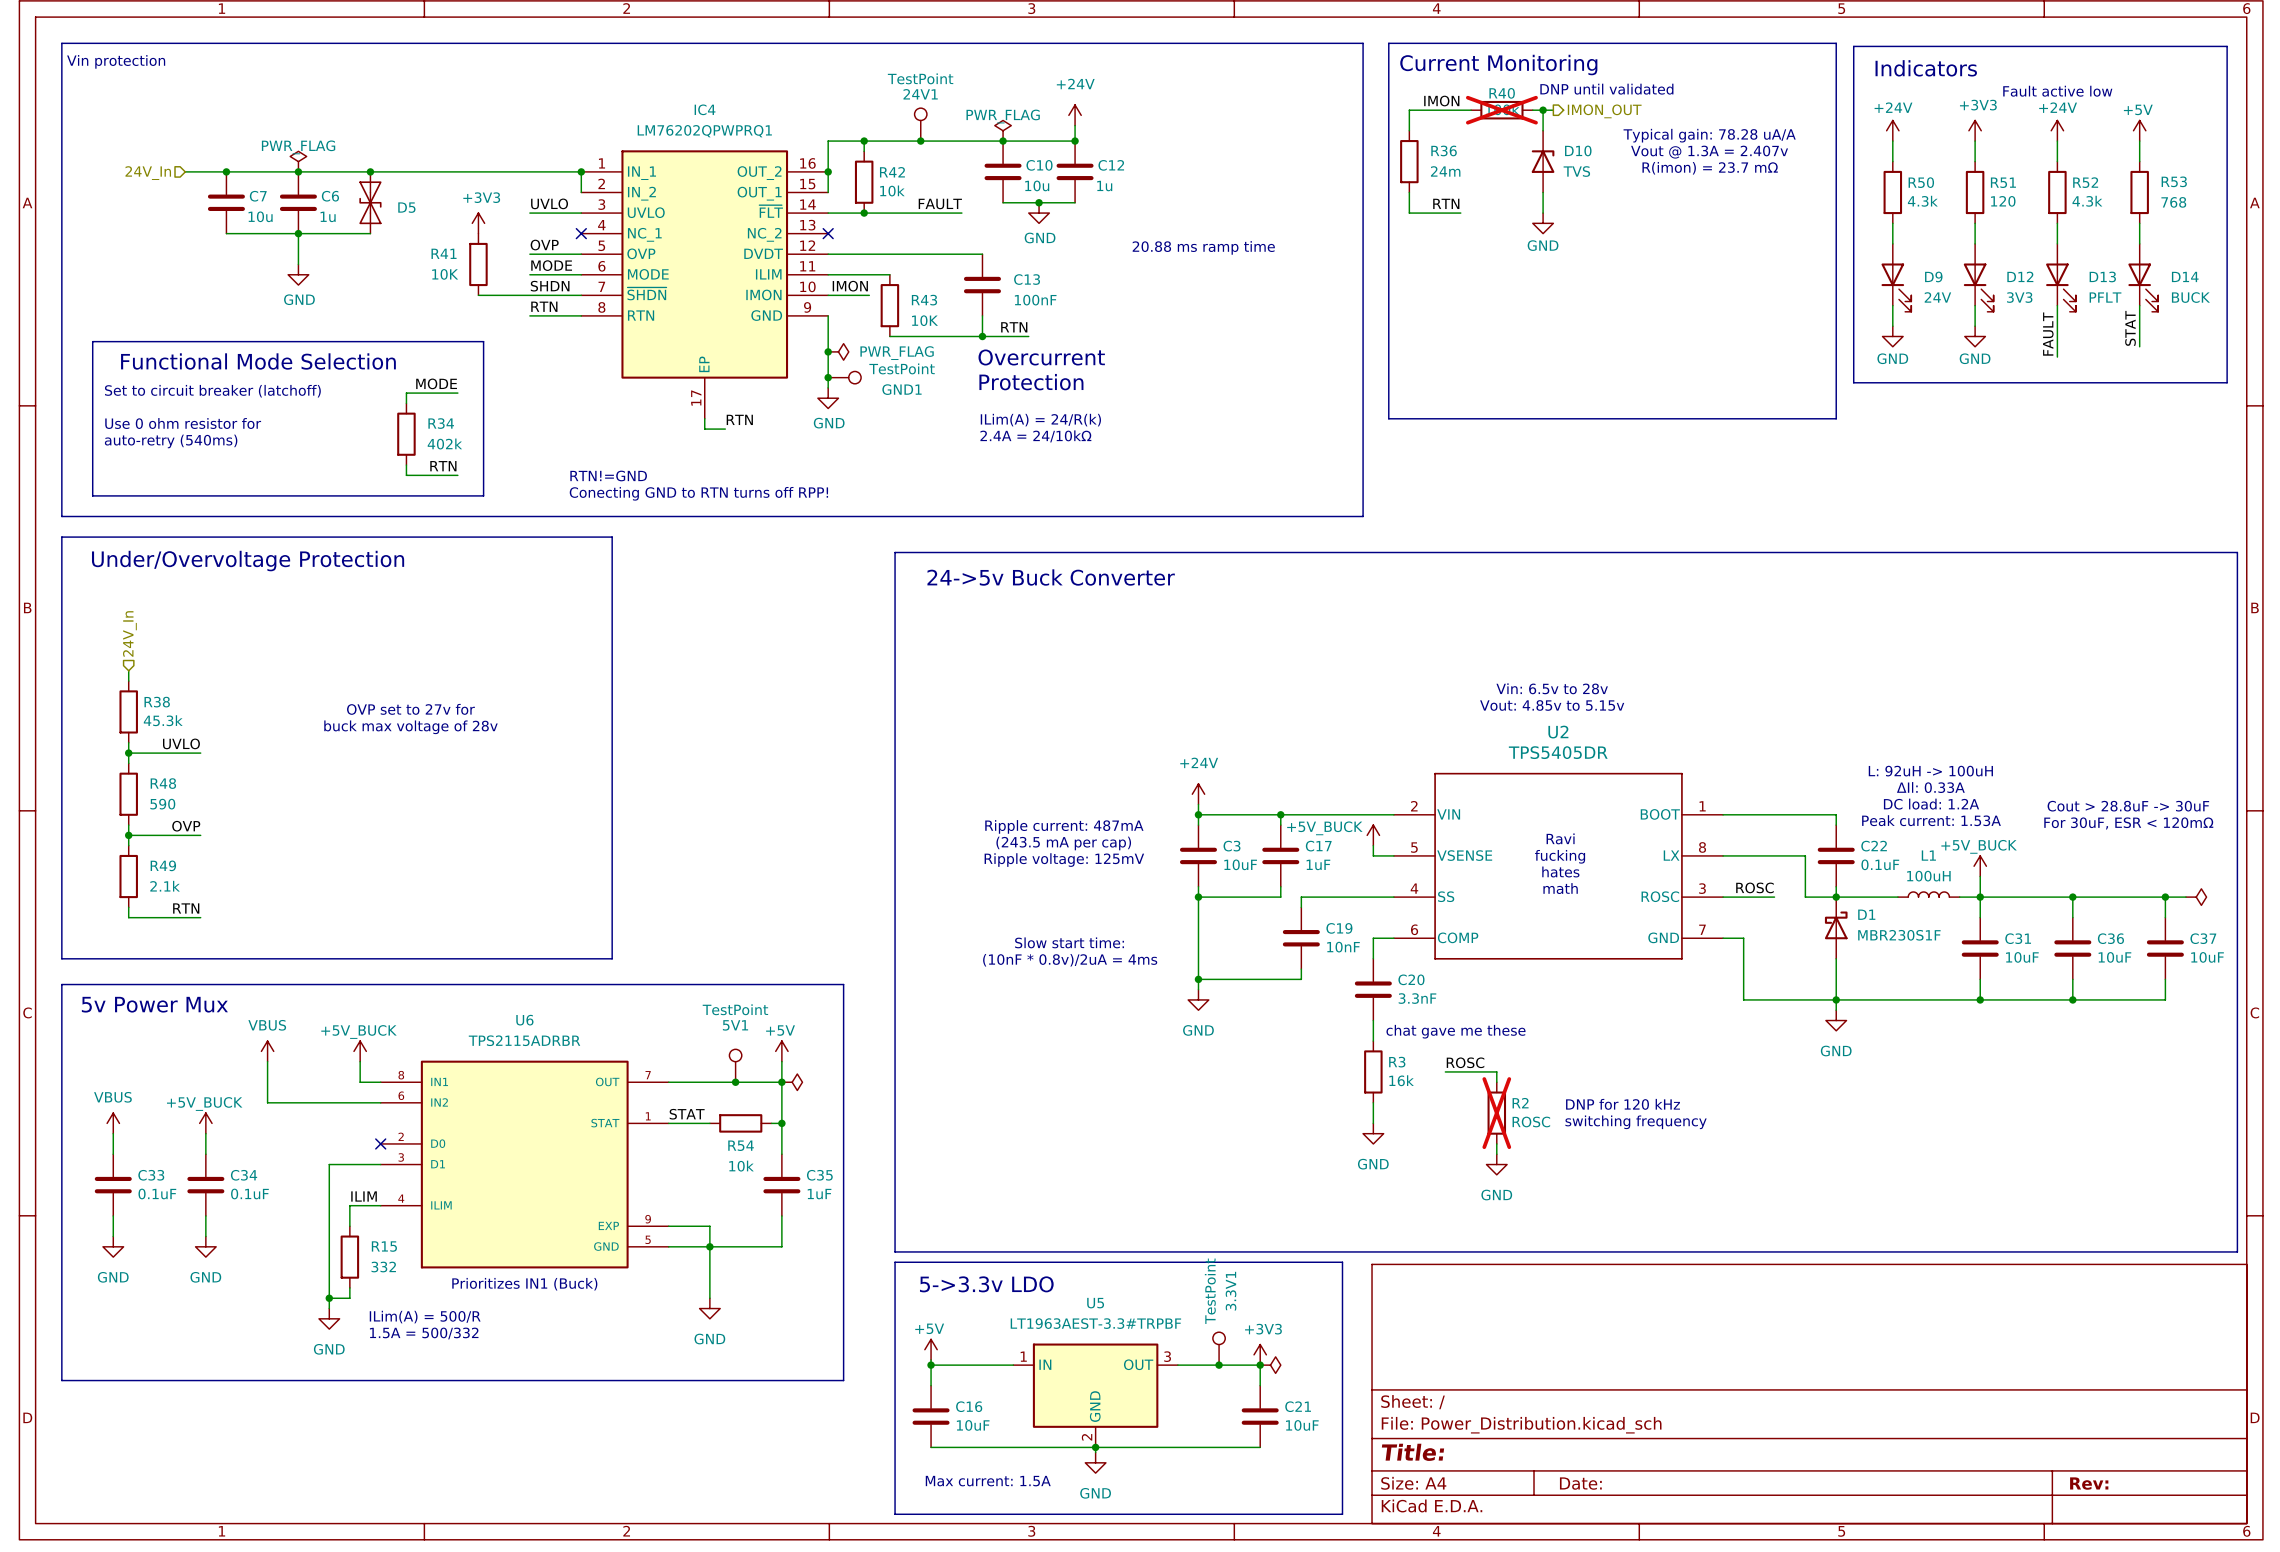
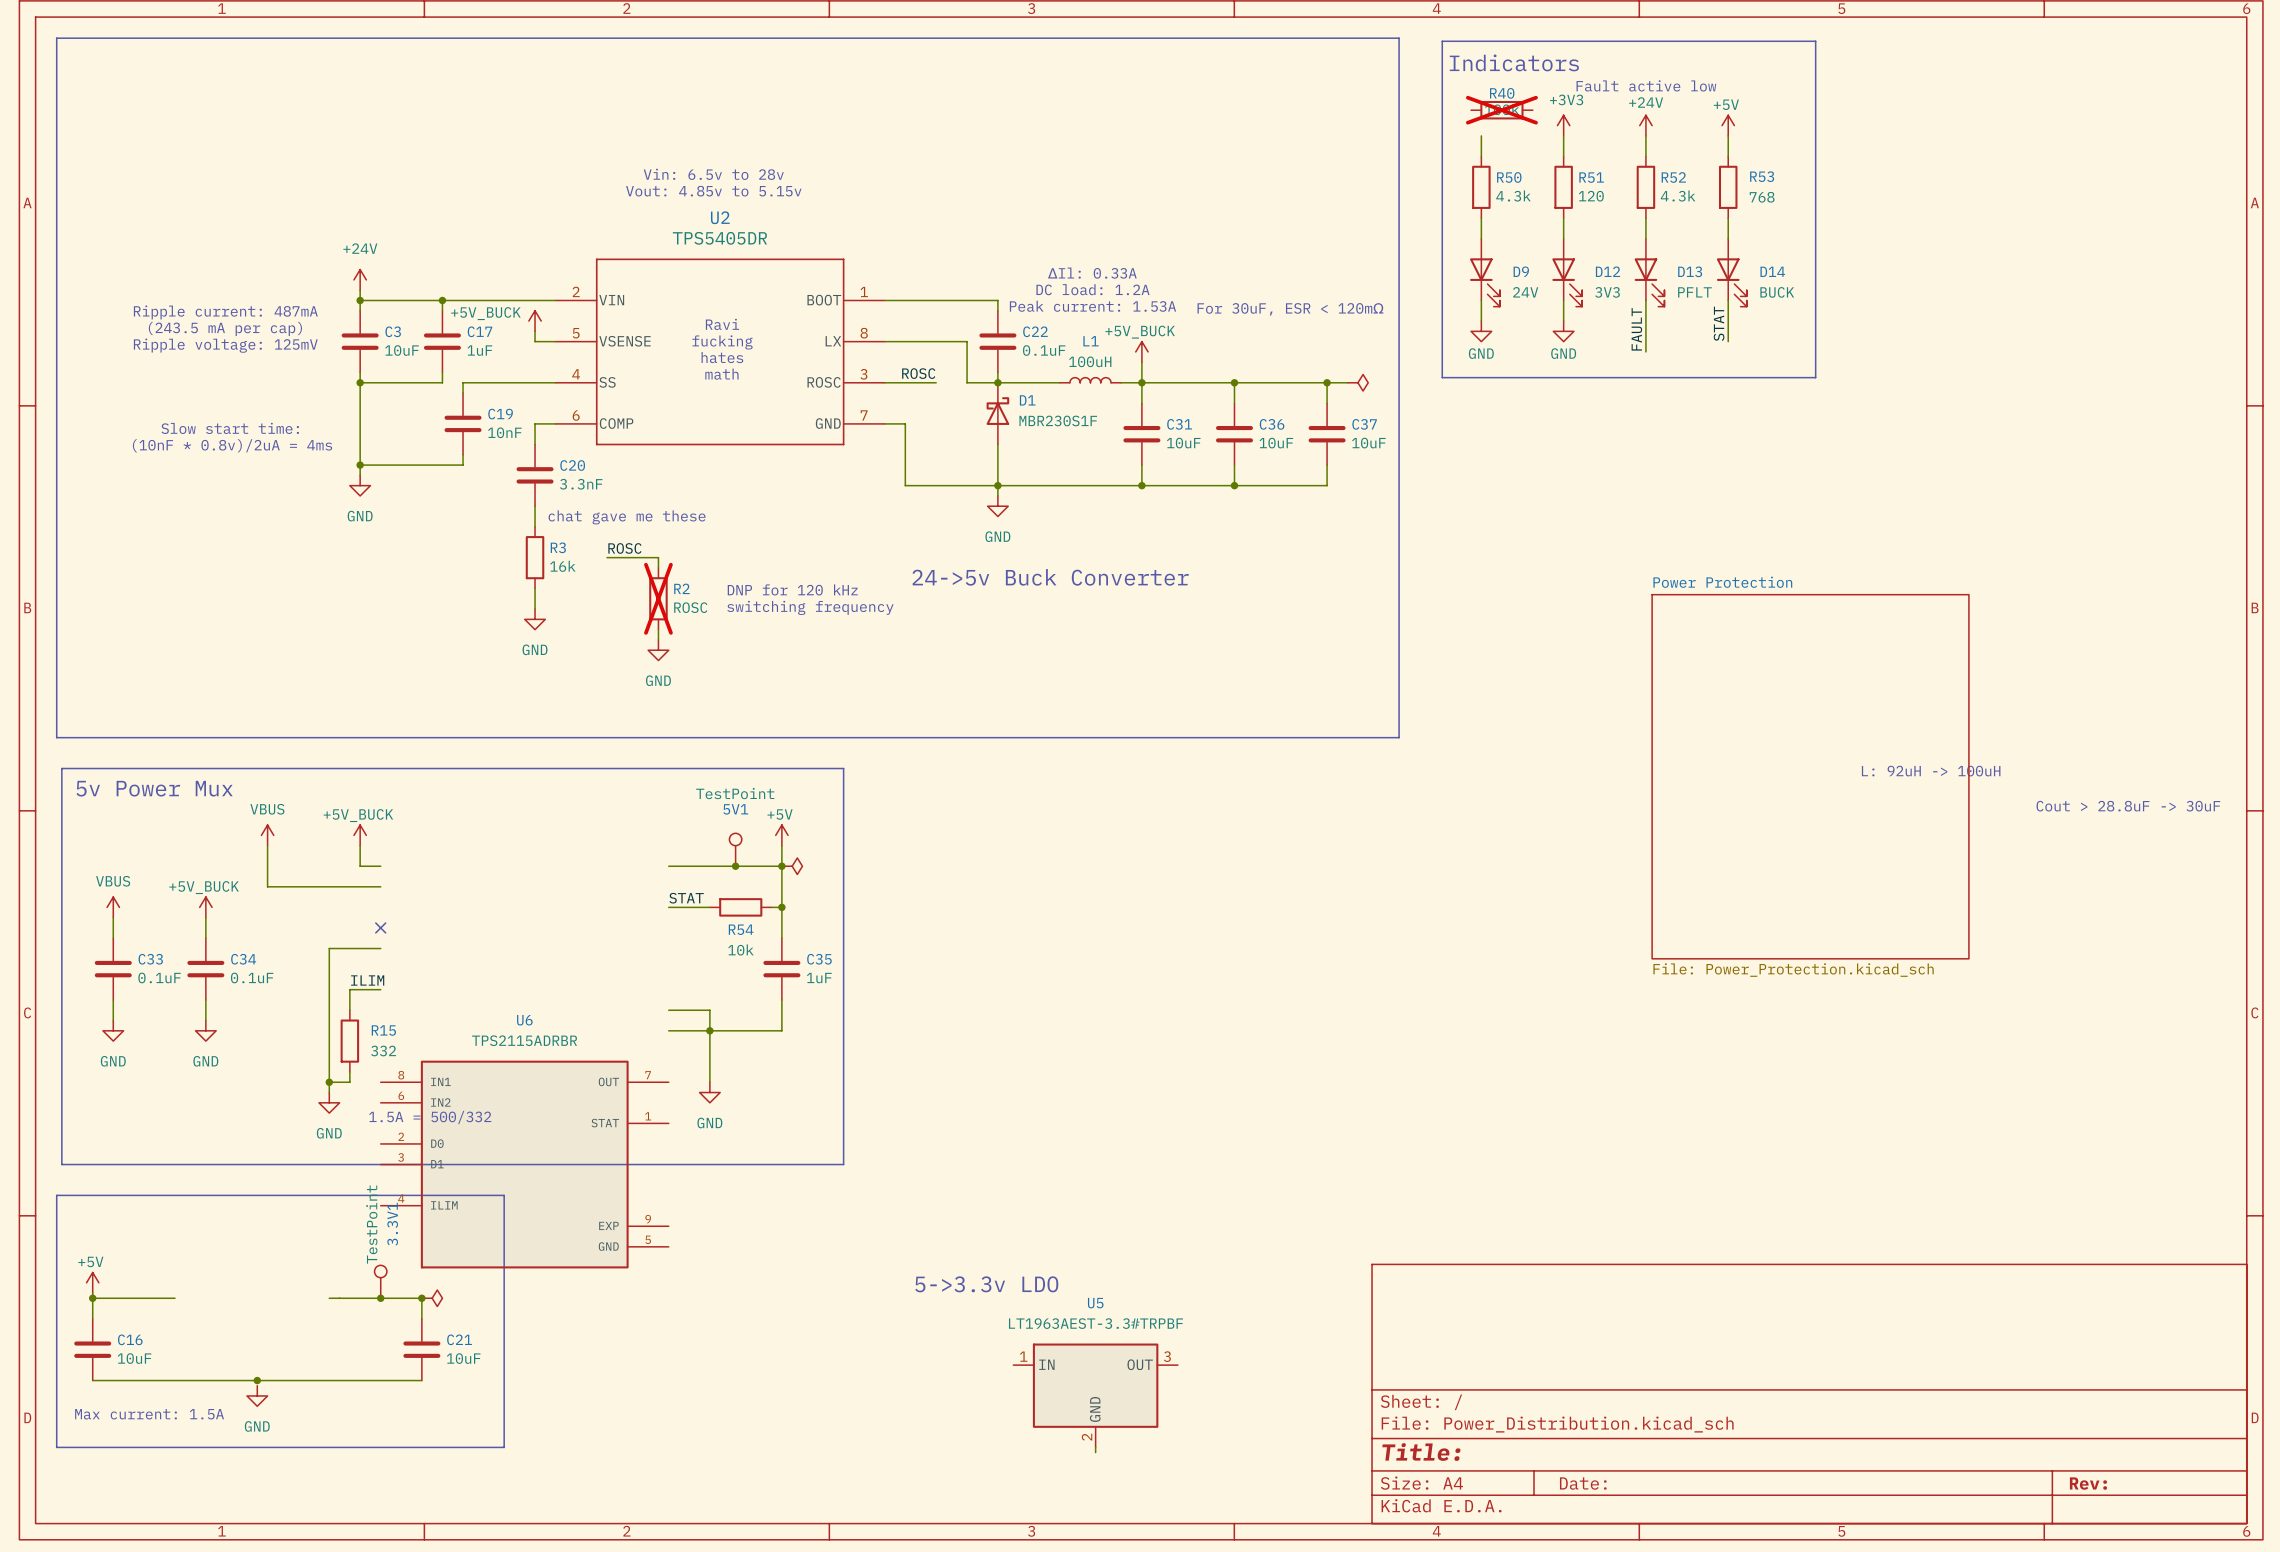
line: (61, 43) (61, 516) (1363, 516) (1363, 43) (61, 43) -> (56, 38) (56, 737) (1399, 737) (1399, 38) (56, 38)
line: (1388, 43) (1836, 43) (1836, 418) (1388, 418) (1388, 43) -> (1442, 41) (1442, 377) (1815, 377) (1815, 41) (1442, 41)
line: (1853, 46) (2227, 46) (2227, 382) (1853, 382) (1853, 46) -> none
text: Vin protection (116, 61) -> none
text: none -> Indicators (1514, 62)
text: Current Monitoring (1498, 65) -> none
text: Indicators (1926, 68) -> none
text: none -> Fault active low (1646, 85)
text: DNP until validated (1606, 89) -> none
text: Fault active low (2057, 91) -> none
label: IMON (1441, 101) -> none
wire: (1471, 110) (1409, 110) (1409, 130) -> none
wire: (1532, 110) (1553, 110) -> none
wire: (1543, 110) (1543, 130) -> (1563, 135) (1563, 156)
junction: (1543, 110) -> none
hierarchical label: IMON_OUT (1604, 111) -> none
power symbol: +24V (1075, 115) -> none
24V1: TestPoint (920, 124) -> none
wire: (1075, 125) (1075, 141) (828, 141) (828, 192) -> none
power symbol: none -> +3V3 (1563, 125)
power symbol: none -> +24V (1645, 125)
power symbol: none -> +5V (1728, 125)
power symbol: PWR_FLAG (1003, 130) -> none
power symbol: +24V (1892, 130) -> none
power symbol: +3V3 (1975, 130) -> none
power symbol: +24V (2057, 130) -> none
power symbol: +5V (2139, 130) -> none
wire: none -> (1481, 135) (1481, 156)
wire: none -> (1645, 135) (1645, 156)
text: Typical gain: 78.28 uA/A (1709, 135) -> none
wire: (864, 141) (864, 151) -> none
junction: (864, 141) -> none
junction: (920, 141) -> none
junction: (1003, 141) -> none
junction: (1075, 141) -> none
wire: (1892, 141) (1892, 161) -> (1728, 135) (1728, 156)
wire: (1975, 141) (1975, 161) -> none
wire: (2057, 141) (2057, 161) -> none
wire: (2139, 141) (2139, 161) -> none
text: Vout @ 1.3A = 2.407v (1709, 152) -> none
power symbol: PWR_FLAG (298, 161) -> none
R36: 24m (1409, 161) -> none
D10: TVS (1543, 161) -> none
text: R(imon) = 23.7 mΩ (1710, 168) -> none
wire: (185, 171) (581, 171) (581, 192) -> none
junction: (226, 171) -> none
junction: (298, 171) -> none
junction: (370, 171) -> none
junction: (581, 171) -> none
junction: (828, 171) -> none
C10: 10u (1003, 171) -> none
C12: 1u (1075, 171) -> none
hierarchical label: 24V_In (148, 173) -> none
text: none -> Vin: 6.5v to 28v (713, 174)
R42: 10k (864, 182) -> none
text: none -> Vout: 4.85v to 5.15v (713, 191)
wire: (1409, 192) (1409, 213) (1460, 213) -> none
wire: (1543, 192) (1543, 213) -> (1563, 218) (1563, 238)
R50 position: (1892, 192) -> (1481, 187)
R51 position: (1975, 192) -> (1563, 187)
R52 position: (2057, 192) -> (1645, 187)
R53 position: (2139, 192) -> (1728, 187)
C7: 10u (226, 202) -> none
C6: 1u (298, 202) -> none
D5: (370, 202) -> none
wire: (1003, 202) (1075, 202) -> none
junction: (1039, 202) -> none
label: UVLO (549, 203) -> none
label: FAULT (940, 203) -> none
label: RTN (1446, 203) -> none
wire: (529, 213) (581, 213) -> none
wire: (828, 213) (961, 213) -> none
junction: (864, 213) -> none
power symbol: GND (1039, 213) -> none
wire: none -> (1481, 218) (1481, 238)
wire: none -> (1645, 218) (1645, 238)
power symbol: +3V3 (478, 223) -> none
power symbol: GND (1543, 223) -> none
wire: (1892, 223) (1892, 243) -> (1728, 218) (1728, 238)
wire: (1975, 223) (1975, 243) -> none
wire: (2057, 223) (2057, 243) -> none
wire: (2139, 223) (2139, 243) -> none
wire: (226, 233) (370, 233) -> none
wire: (298, 233) (298, 264) -> none
junction: (298, 233) -> none
no-connect mark: (581, 233) -> none
no-connect mark: (828, 233) -> none
label: OVP (544, 245) -> none
text: 20.88 ms ramp time (1203, 247) -> none
wire: (529, 254) (581, 254) -> none
wire: (828, 254) (982, 254) -> none
R41: 10K (478, 264) -> none
label: MODE (551, 265) -> none
text: none -> ΔIl: 0.33A (1092, 273)
power symbol: GND (298, 274) -> none
wire: (529, 274) (581, 274) -> none
wire: (828, 274) (889, 274) -> none
D9 position: (1896, 277) -> (1484, 272)
D12 position: (1978, 277) -> (1567, 272)
D13 position: (2060, 277) -> (1649, 272)
D14 position: (2143, 277) -> (1731, 272)
power symbol: none -> +24V (360, 279)
IC4: LM76202QPWPRQ1 (704, 284) -> none
C13: 100nF (982, 285) -> none
label: SHDN (550, 286) -> none
label: IMON (850, 286) -> none
text: none -> DC load: 1.2A (1093, 289)
wire: none -> (360, 290) (360, 310)
wire: (478, 295) (581, 295) -> none
wire: (828, 295) (869, 295) -> none
wire: none -> (360, 300) (555, 300)
junction: none -> (360, 300)
wire: none -> (442, 300) (442, 310)
junction: none -> (442, 300)
wire: none -> (884, 300) (997, 300) (997, 310)
wire: none -> (1481, 300) (1481, 321)
wire: none -> (1563, 300) (1563, 321)
wire: none -> (1645, 300) (1645, 351)
wire: none -> (1728, 300) (1728, 341)
R43: 10K (889, 305) -> none
wire: (1892, 305) (1892, 326) -> none
wire: (1975, 305) (1975, 326) -> none
wire: (2057, 305) (2057, 357) -> none
wire: (2139, 305) (2139, 346) -> none
label: RTN (544, 306) -> none
text: none -> Peak current: 1.53A (1092, 306)
text: none -> For 30uF, ESR < 120mΩ (1290, 309)
text: none -> Ripple current: 487mA (225, 312)
wire: (529, 315) (581, 315) -> none
wire: (828, 315) (828, 387) -> none
wire: (982, 315) (982, 336) -> none
power symbol: none -> +5V_BUCK (535, 321)
label: none -> STAT (1719, 323)
text: none -> Ravi (722, 324)
label: RTN (1014, 327) -> none
label: none -> FAULT (1636, 329)
label: STAT (2130, 328) -> none
text: none -> (243.5 mA per cap) (225, 328)
power symbol: none -> GND (1481, 331)
power symbol: none -> GND (1563, 331)
label: FAULT (2048, 334) -> none
wire: (889, 336) (1028, 336) -> none
junction: (982, 336) -> none
power symbol: GND (1892, 336) -> none
power symbol: GND (1975, 336) -> none
line: (92, 341) (483, 341) (483, 495) (92, 495) (92, 341) -> none
wire: none -> (884, 341) (967, 341) (967, 382) (1059, 382)
text: none -> fucking (722, 342)
text: none -> Ripple voltage: 125mV (225, 345)
junction: (828, 351) -> none
power symbol: PWR_FLAG (838, 351) -> none
power symbol: none -> +5V_BUCK (1141, 351)
text: none -> hates (722, 357)
text: Overcurrent (1041, 357) -> none
text: Functional Mode Selection (258, 361) -> none
wire: none -> (1141, 362) (1141, 403)
wire: none -> (360, 372) (360, 475)
wire: none -> (442, 372) (442, 382) (360, 382)
wire: none -> (997, 372) (997, 382)
label: none -> ROSC (918, 373)
text: none -> math (721, 374)
junction: (828, 377) -> none
GND1: TestPoint (844, 377) -> none
junction: none -> (360, 382)
wire: none -> (555, 382) (463, 382) (463, 393)
wire: none -> (884, 382) (936, 382)
junction: none -> (997, 382)
text: Protection (1031, 382) -> none
wire: none -> (1121, 382) (1347, 382)
junction: none -> (1141, 382)
wire: none -> (1234, 382) (1234, 403)
junction: none -> (1234, 382)
wire: none -> (1327, 382) (1327, 403)
junction: none -> (1327, 382)
power symbol: none -> (1357, 382)
label: MODE (436, 383) -> none
text: Set to circuit breaker (latchoff) (212, 391) -> none
wire: (457, 393) (406, 393) (406, 403) -> none
power symbol: GND (828, 398) -> none
wire: (704, 418) (704, 429) (725, 429) -> (535, 331) (535, 341) (555, 341)
label: RTN (739, 419) -> none
text: ILim(A) = 24/R(k) (1040, 420) -> none
text: Use 0 ohm resistor for (183, 423) -> none
wire: none -> (555, 423) (535, 423) (535, 444)
wire: none -> (884, 423) (905, 423) (905, 485) (1327, 485) (1327, 465)
text: none -> Slow start time: (230, 428)
R34: 402k (406, 434) -> none
text: 2.4A = 24/10kΩ (1035, 436) -> none
text: auto-retry (540ms) (171, 441) -> none
wire: none -> (997, 444) (997, 495)
text: none -> (10nF * 0.8v)/2uA = 4ms (232, 445)
wire: none -> (463, 454) (463, 465) (360, 465)
junction: none -> (360, 465)
wire: (406, 465) (406, 475) (457, 475) -> none
wire: none -> (1141, 465) (1141, 485)
wire: none -> (1234, 465) (1234, 485)
label: RTN (443, 466) -> none
text: RTN!=GND (608, 475) -> none
power symbol: none -> GND (360, 485)
junction: none -> (997, 485)
junction: none -> (1141, 485)
junction: none -> (1234, 485)
text: Conecting GND to RTN turns off RPP! (698, 493) -> none
wire: none -> (535, 506) (535, 526)
power symbol: none -> GND (997, 506)
text: none -> chat gave me these (627, 517)
label: none -> ROSC (624, 548)
line: (895, 552) (895, 1251) (2237, 1251) (2237, 552) (895, 552) -> none
wire: none -> (607, 557) (658, 557) (658, 567)
text: Under/Overvoltage Protection (248, 561) -> none
wire: none -> (535, 588) (535, 609)
text: none -> DNP for 120 kHz (792, 589)
text: none -> switching frequency (810, 607)
power symbol: none -> GND (535, 619)
wire: none -> (658, 629) (658, 639)
hierarchical label: 24V_In (129, 633) -> none
power symbol: none -> GND (658, 650)
wire: (128, 670) (128, 681) -> none
text: Vin: 6.5v to 28v (1552, 688) -> none
text: Vout: 4.85v to 5.15v (1552, 705) -> none
text: OVP set to 27v for (410, 709) -> none
R38: 45.3k (128, 711) -> none
text: buck max voltage of 28v (410, 727) -> none
wire: (128, 742) (128, 763) -> (113, 917) (113, 938)
label: UVLO (181, 743) -> none
wire: (128, 753) (200, 753) -> none
junction: (128, 753) -> none
line: (61, 768) (61, 537) (612, 537) (612, 958) (61, 958) -> (61, 984) (61, 958)
sheet Power Protection: none -> File: Power_Protection.kicad_sch (1810, 776)
text: ΔIl: 0.33A (1930, 787) -> none
text: none -> 5v Power Mux (154, 788)
R48: 590 (128, 794) -> none
power symbol: +24V (1198, 794) -> none
wire: (1198, 804) (1198, 825) -> none
text: DC load: 1.2A (1931, 804) -> none
wire: (1198, 814) (1393, 814) -> none
junction: (1198, 814) -> none
wire: (1280, 814) (1280, 825) -> none
junction: (1280, 814) -> none
wire: (1723, 814) (1836, 814) (1836, 825) -> none
text: Peak current: 1.53A (1931, 820) -> none
text: For 30uF, ESR < 120mΩ (2128, 823) -> none
wire: (128, 825) (128, 845) -> (205, 917) (205, 938)
label: OVP (186, 826) -> none
text: Ripple current: 487mA (1064, 826) -> none
wire: (128, 835) (200, 835) -> none
junction: (128, 835) -> none
power symbol: none -> VBUS (267, 835)
power symbol: none -> +5V_BUCK (360, 835)
power symbol: none -> +5V (781, 835)
power symbol: +5V_BUCK (1373, 835) -> none
text: Ravi (1560, 838) -> none
text: (243.5 mA per cap) (1063, 843) -> none
wire: none -> (267, 845) (267, 886) (380, 886)
wire: none -> (360, 845) (360, 866) (380, 866)
wire: none -> (781, 845) (781, 938)
wire: (1373, 845) (1373, 855) (1393, 855) -> none
C3 position: (1198, 855) -> (360, 341)
C17 position: (1280, 855) -> (442, 341)
wire: (1723, 855) (1805, 855) (1805, 897) (1897, 897) -> none
C22 position: (1836, 855) -> (997, 341)
text: fucking (1560, 856) -> none
text: Ripple voltage: 125mV (1064, 860) -> none
wire: none -> (668, 866) (781, 866)
junction: none -> (735, 866)
junction: none -> (781, 866)
power symbol: none -> (792, 866)
U2 position: (1558, 866) -> (720, 351)
power symbol: +5V_BUCK (1980, 866) -> none
text: hates (1560, 871) -> none
R49: 2.1k (128, 876) -> none
wire: (1980, 876) (1980, 917) -> none
wire: (1198, 886) (1198, 989) -> none
wire: (1280, 886) (1280, 897) (1198, 897) -> none
wire: (1836, 886) (1836, 897) -> none
label: ROSC (1754, 887) -> none
text: math (1560, 888) -> none
L1 position: (1928, 894) -> (1090, 380)
junction: (1198, 897) -> none
wire: (1393, 897) (1301, 897) (1301, 907) -> none
wire: (1723, 897) (1774, 897) -> none
junction: (1836, 897) -> none
wire: (1959, 897) (2185, 897) -> none
junction: (1980, 897) -> none
wire: (2072, 897) (2072, 917) -> none
junction: (2072, 897) -> none
wire: (2165, 897) (2165, 917) -> none
junction: (2165, 897) -> none
power symbol: (2196, 897) -> none
label: none -> STAT (686, 898)
power symbol: none -> VBUS (113, 907)
wire: (128, 907) (128, 917) (200, 917) -> none
power symbol: none -> +5V_BUCK (205, 907)
wire: none -> (668, 907) (709, 907)
wire: none -> (771, 907) (781, 907)
junction: none -> (781, 907)
label: RTN (186, 908) -> none
no-connect mark: none -> (380, 927)
D1 position: (1836, 927) -> (997, 413)
C19 position: (1301, 938) -> (463, 423)
wire: (1393, 938) (1373, 938) (1373, 958) -> none
wire: (1723, 938) (1743, 938) (1743, 999) (2165, 999) (2165, 979) -> none
text: Slow start time: (1069, 942) -> none
wire: none -> (380, 948) (329, 948) (329, 1092)
C31 position: (1980, 948) -> (1141, 434)
C36 position: (2072, 948) -> (1234, 434)
C37 position: (2165, 948) -> (1327, 434)
wire: (1836, 958) (1836, 1010) -> none
text: (10nF * 0.8v)/2uA = 4ms (1070, 960) -> none
wire: (1301, 969) (1301, 979) (1198, 979) -> none
junction: (1198, 979) -> none
wire: (1980, 979) (1980, 999) -> none
wire: (2072, 979) (2072, 999) -> none
label: none -> ILIM (367, 980)
line: (61, 984) (843, 984) -> (61, 768) (843, 768) (843, 984)
wire: none -> (380, 989) (349, 989) (349, 1010)
C20 position: (1373, 989) -> (535, 475)
wire: none -> (781, 999) (781, 1030) (668, 1030)
power symbol: GND (1198, 999) -> none
junction: (1836, 999) -> none
junction: (1980, 999) -> none
junction: (2072, 999) -> none
text: 5v Power Mux (154, 1004) -> none
wire: none -> (668, 1010) (709, 1010) (709, 1082)
wire: (1373, 1020) (1373, 1041) -> none
power symbol: GND (1836, 1020) -> none
power symbol: none -> GND (113, 1030)
power symbol: none -> GND (205, 1030)
junction: none -> (709, 1030)
text: chat gave me these (1455, 1031) -> none
power symbol: VBUS (267, 1051) -> none
power symbol: +5V_BUCK (360, 1051) -> none
power symbol: +5V (781, 1051) -> none
wire: (267, 1061) (267, 1102) (380, 1102) -> none
wire: (360, 1061) (360, 1082) (380, 1082) -> none
wire: (781, 1061) (781, 1154) -> none
label: ROSC (1465, 1062) -> none
5V1 position: (735, 1065) -> (735, 849)
wire: none -> (349, 1071) (349, 1082) (329, 1082)
R3 position: (1373, 1071) -> (535, 557)
wire: (1445, 1071) (1496, 1071) (1496, 1082) -> none
junction: none -> (329, 1082)
wire: (668, 1082) (781, 1082) -> none
junction: (735, 1082) -> none
junction: (781, 1082) -> none
power symbol: (792, 1082) -> none
power symbol: none -> GND (709, 1092)
power symbol: none -> GND (329, 1102)
wire: (1373, 1102) (1373, 1123) -> none
text: DNP for 120 kHz (1623, 1104) -> none
R2 position: (1496, 1113) -> (658, 598)
label: STAT (687, 1114) -> none
text: none -> 1.5A = 500/332 (430, 1117)
text: switching frequency (1636, 1122) -> none
power symbol: VBUS (113, 1123) -> none
power symbol: +5V_BUCK (205, 1123) -> none
wire: (668, 1123) (709, 1123) -> none
R54 position: (740, 1123) -> (740, 907)
wire: (771, 1123) (781, 1123) -> none
junction: (781, 1123) -> none
wire: (113, 1133) (113, 1154) -> (113, 999) (113, 1020)
wire: (205, 1133) (205, 1154) -> (205, 999) (205, 1020)
power symbol: GND (1373, 1133) -> none
no-connect mark: (380, 1143) -> none
wire: (1496, 1143) (1496, 1154) -> none
line: (61, 1164) (61, 1380) (843, 1380) (843, 1164) -> (61, 1164) (843, 1164)
wire: (380, 1164) (329, 1164) (329, 1308) -> none
power symbol: GND (1496, 1164) -> none
C33 position: (113, 1185) -> (113, 969)
C34 position: (205, 1185) -> (205, 969)
C35 position: (781, 1185) -> (781, 969)
line: none -> (56, 1195) (504, 1195) (504, 1447) (56, 1447) (56, 1195)
label: ILIM (364, 1196) -> none
wire: (380, 1205) (349, 1205) (349, 1226) -> none
wire: (113, 1215) (113, 1236) -> none
wire: (205, 1215) (205, 1236) -> none
wire: (781, 1215) (781, 1246) (668, 1246) -> none
wire: (668, 1226) (709, 1226) (709, 1298) -> none
power symbol: GND (113, 1246) -> none
power symbol: GND (205, 1246) -> none
junction: (709, 1246) -> none
R15 position: (349, 1257) -> (349, 1041)
line: (895, 1262) (1342, 1262) (1342, 1514) (895, 1514) (895, 1262) -> none
power symbol: none -> +5V (92, 1282)
text: Prioritizes IN1 (Buck) (524, 1284) -> none
wire: (349, 1287) (349, 1298) -> (421, 1318) (421, 1298) (349, 1298)
wire: none -> (92, 1293) (92, 1318)
wire: none -> (92, 1298) (175, 1298)
junction: none -> (92, 1298)
junction: (329, 1298) -> none
junction: none -> (380, 1298)
junction: none -> (421, 1298)
power symbol: none -> (432, 1298)
power symbol: GND (709, 1308) -> none
text: ILim(A) = 500/R (425, 1317) -> none
power symbol: GND (329, 1318) -> none
text: 1.5A = 500/332 (424, 1333) -> none
3.3V1 position: (1219, 1348) -> (380, 1281)
power symbol: +5V (931, 1349) -> none
power symbol: +3V3 (1260, 1354) -> none
wire: (931, 1359) (931, 1385) -> none
wire: (931, 1365) (1013, 1365) -> none
junction: (931, 1365) -> none
wire: (1177, 1365) (1260, 1365) (1260, 1385) -> none
junction: (1219, 1365) -> none
junction: (1260, 1365) -> none
power symbol: (1270, 1365) -> none
junction: none -> (257, 1380)
power symbol: none -> GND (257, 1395)
text: none -> Max current: 1.5A (149, 1414)
C16 position: (931, 1416) -> (92, 1349)
C21 position: (1260, 1416) -> (421, 1349)
wire: (931, 1447) (1260, 1447) -> none
junction: (1095, 1447) -> none
power symbol: GND (1095, 1462) -> none
text: Max current: 1.5A (988, 1481) -> none

